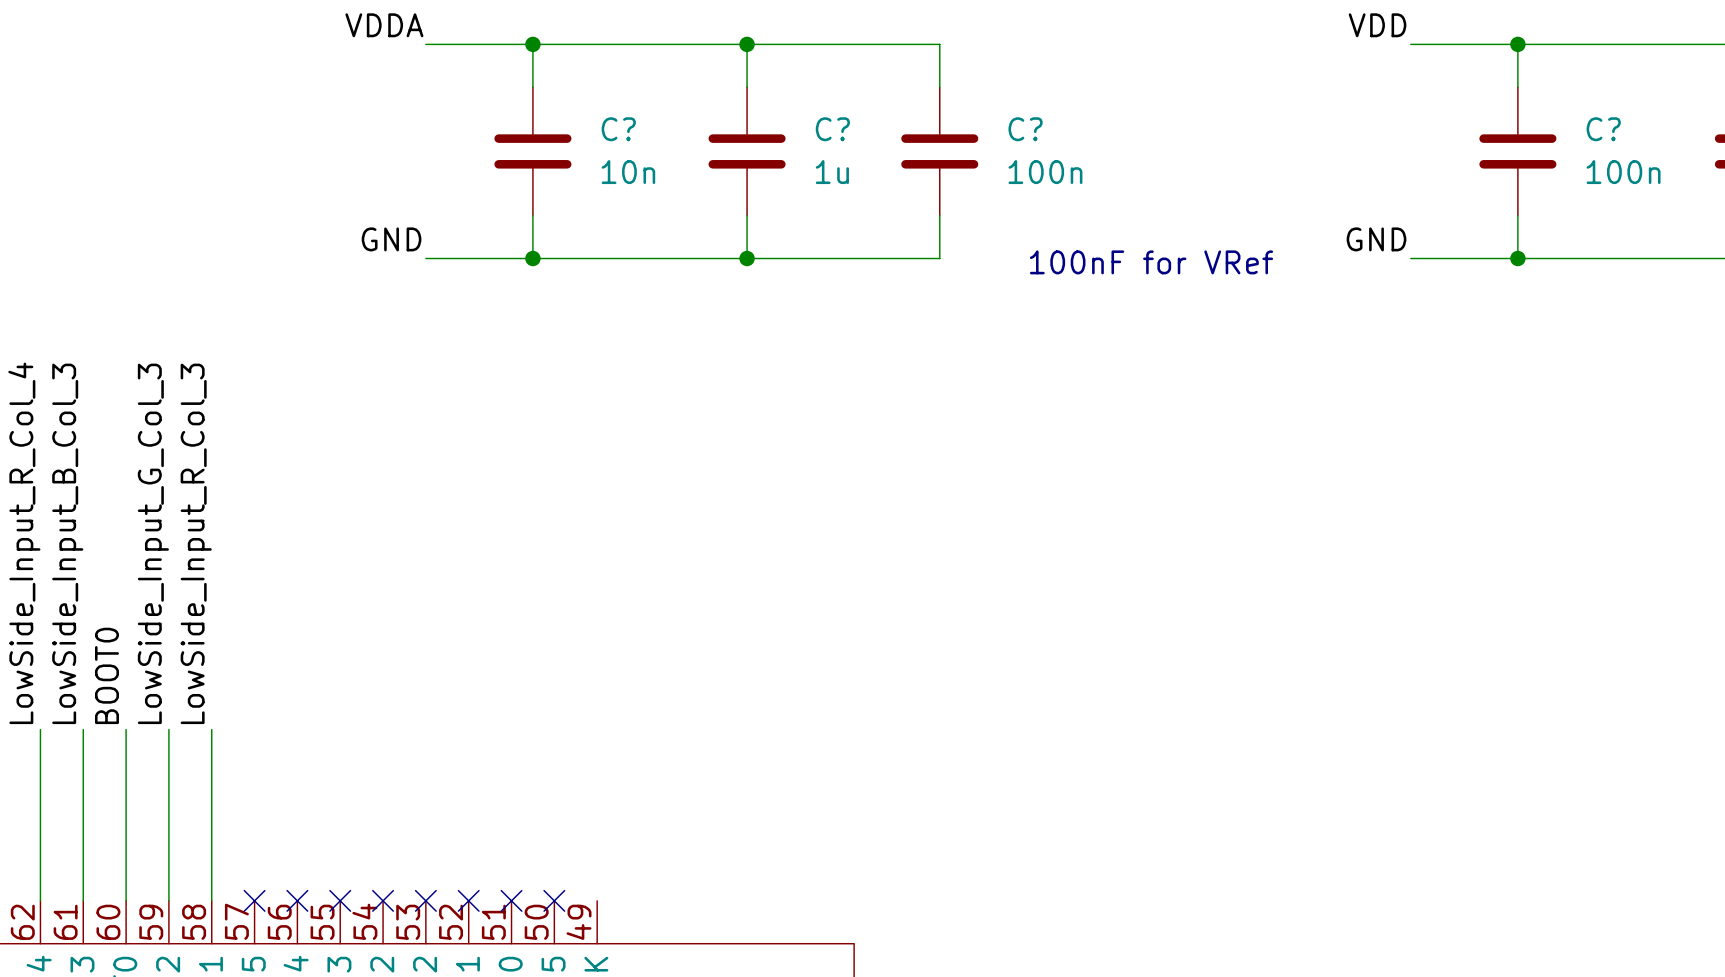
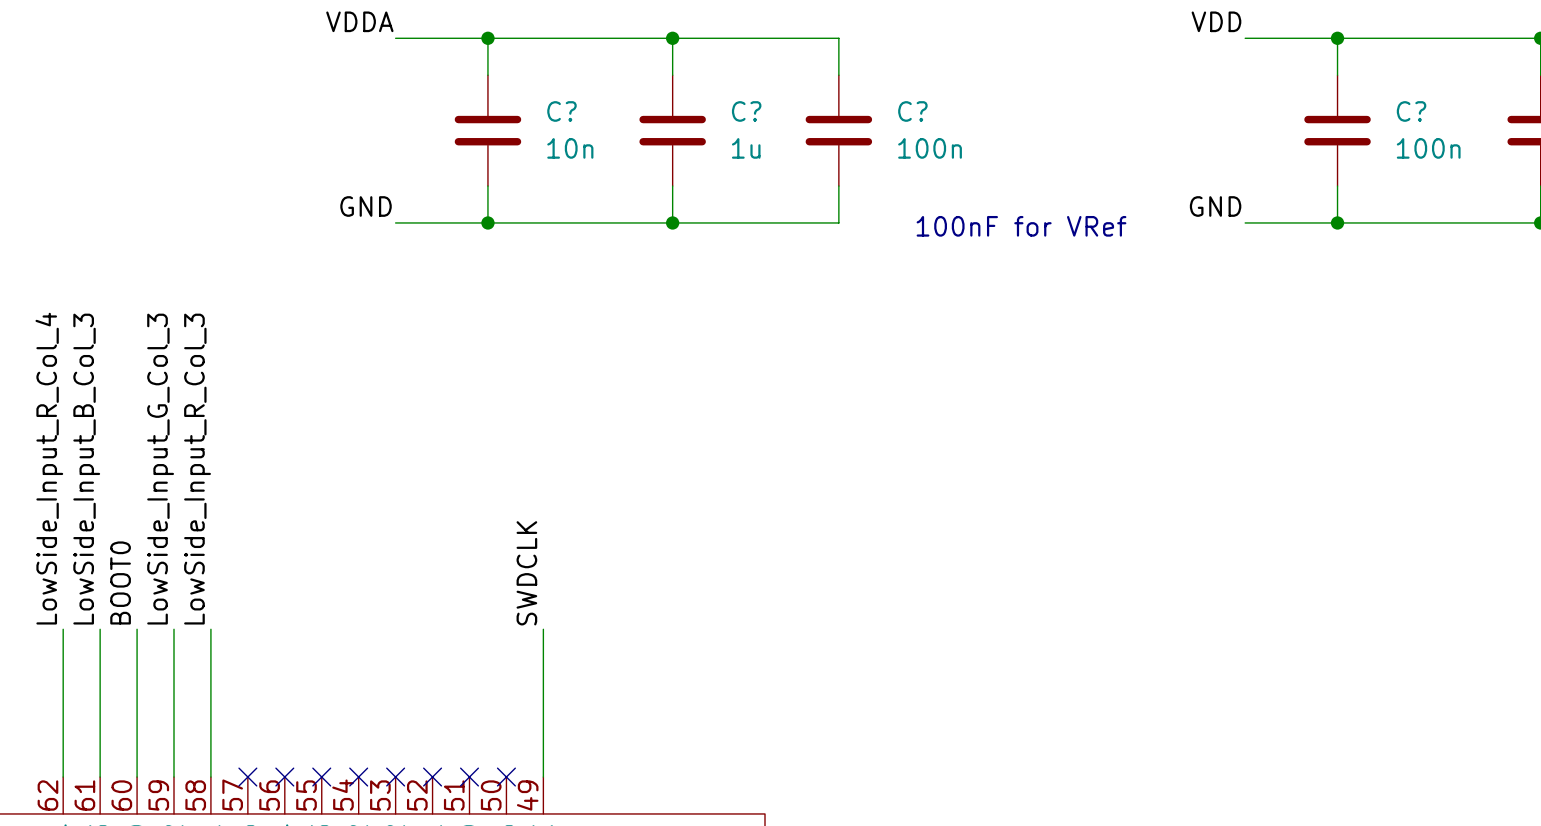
label: none -> SWDCLK (526, 573)
wire: none -> (543, 629) (543, 777)

